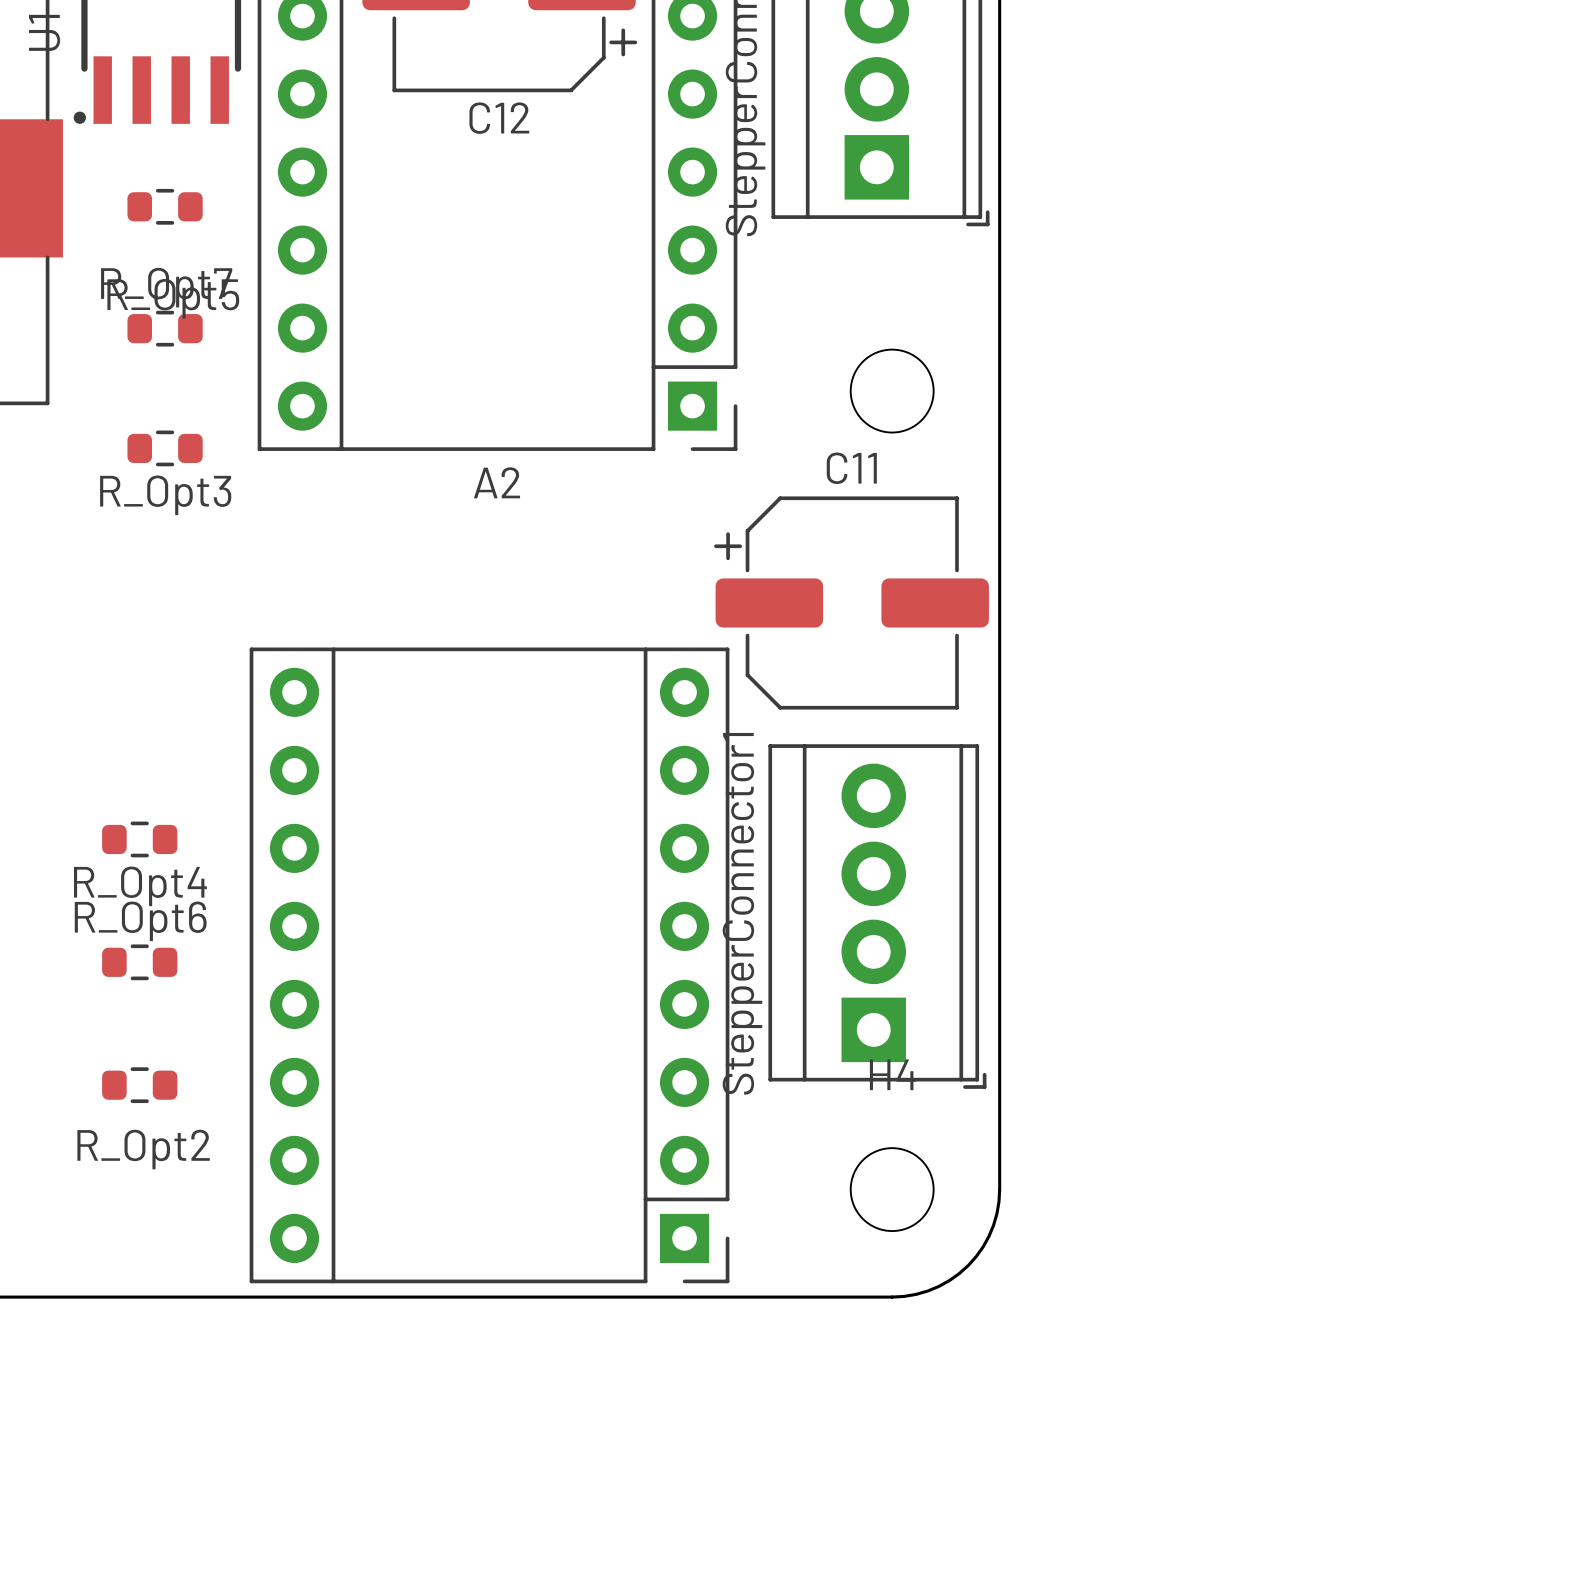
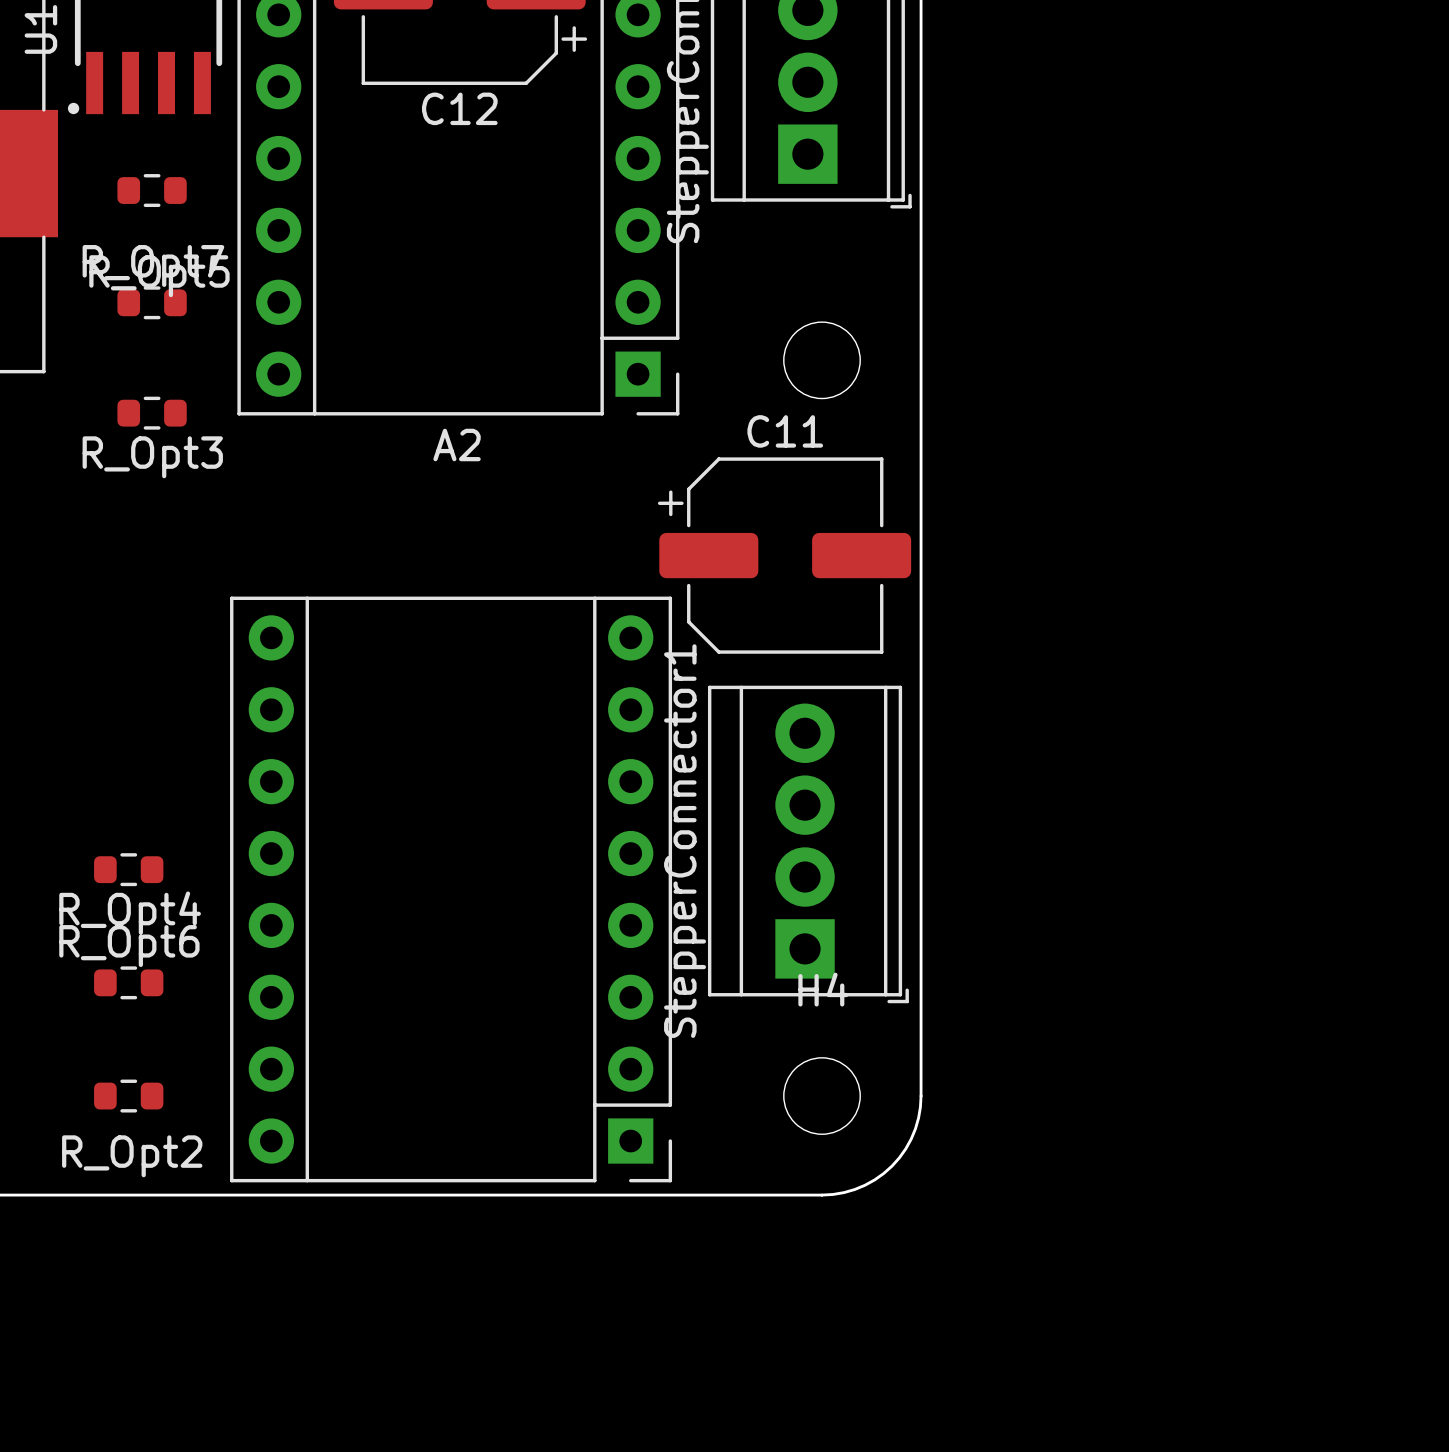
R_Opt4 position: (139, 839) -> (128, 869)
R_Opt6 position: (139, 962) -> (128, 982)
R_Opt2 position: (139, 1085) -> (128, 1096)

